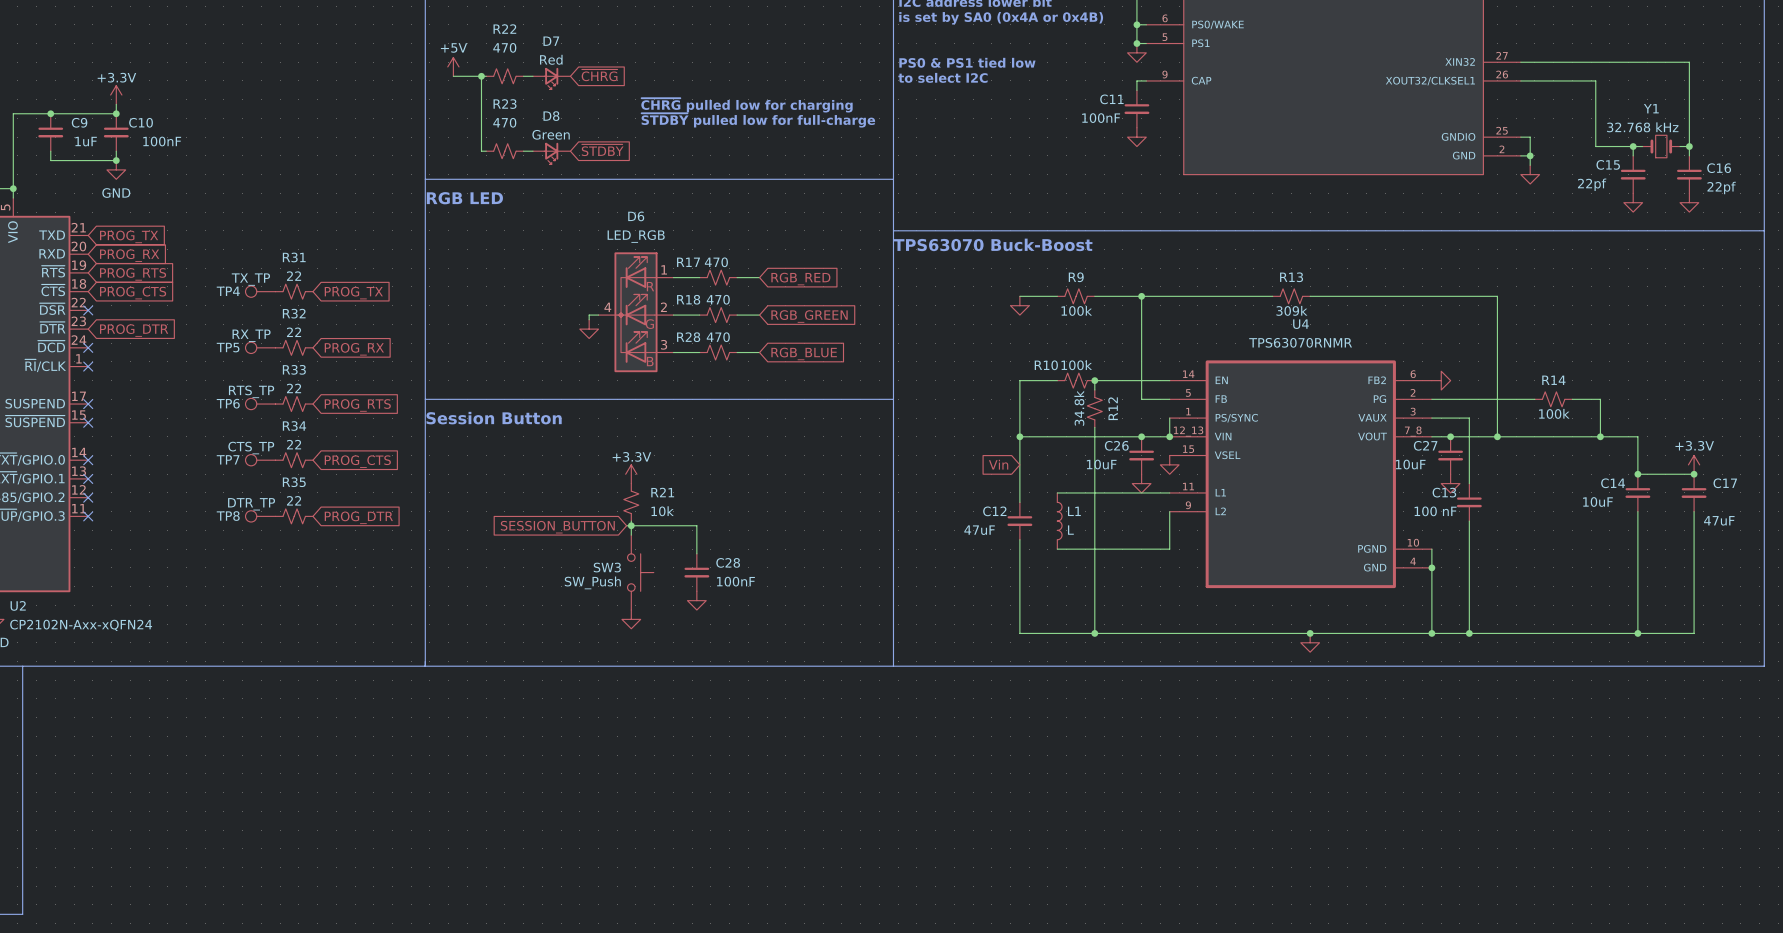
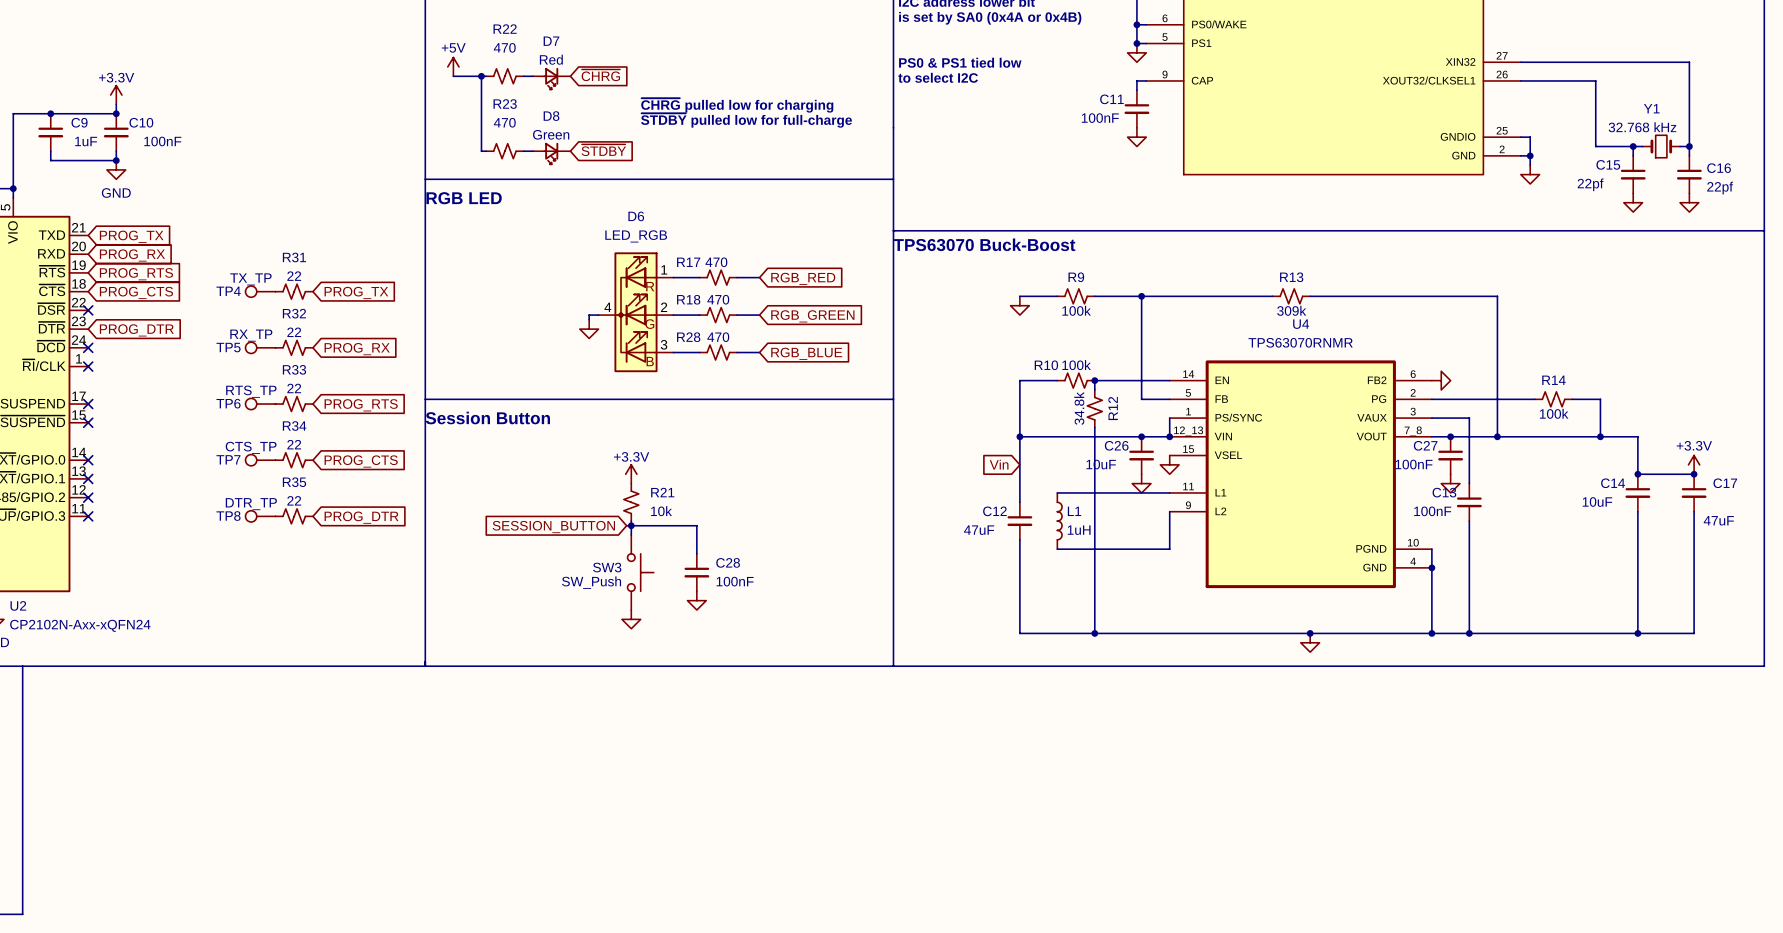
C27 value: 10uF (1410, 464) -> 100nF (1413, 464)
C13 value: 100 nF (1435, 511) -> 100nF (1432, 511)
L1 value: L (1070, 530) -> 1uH (1079, 530)

